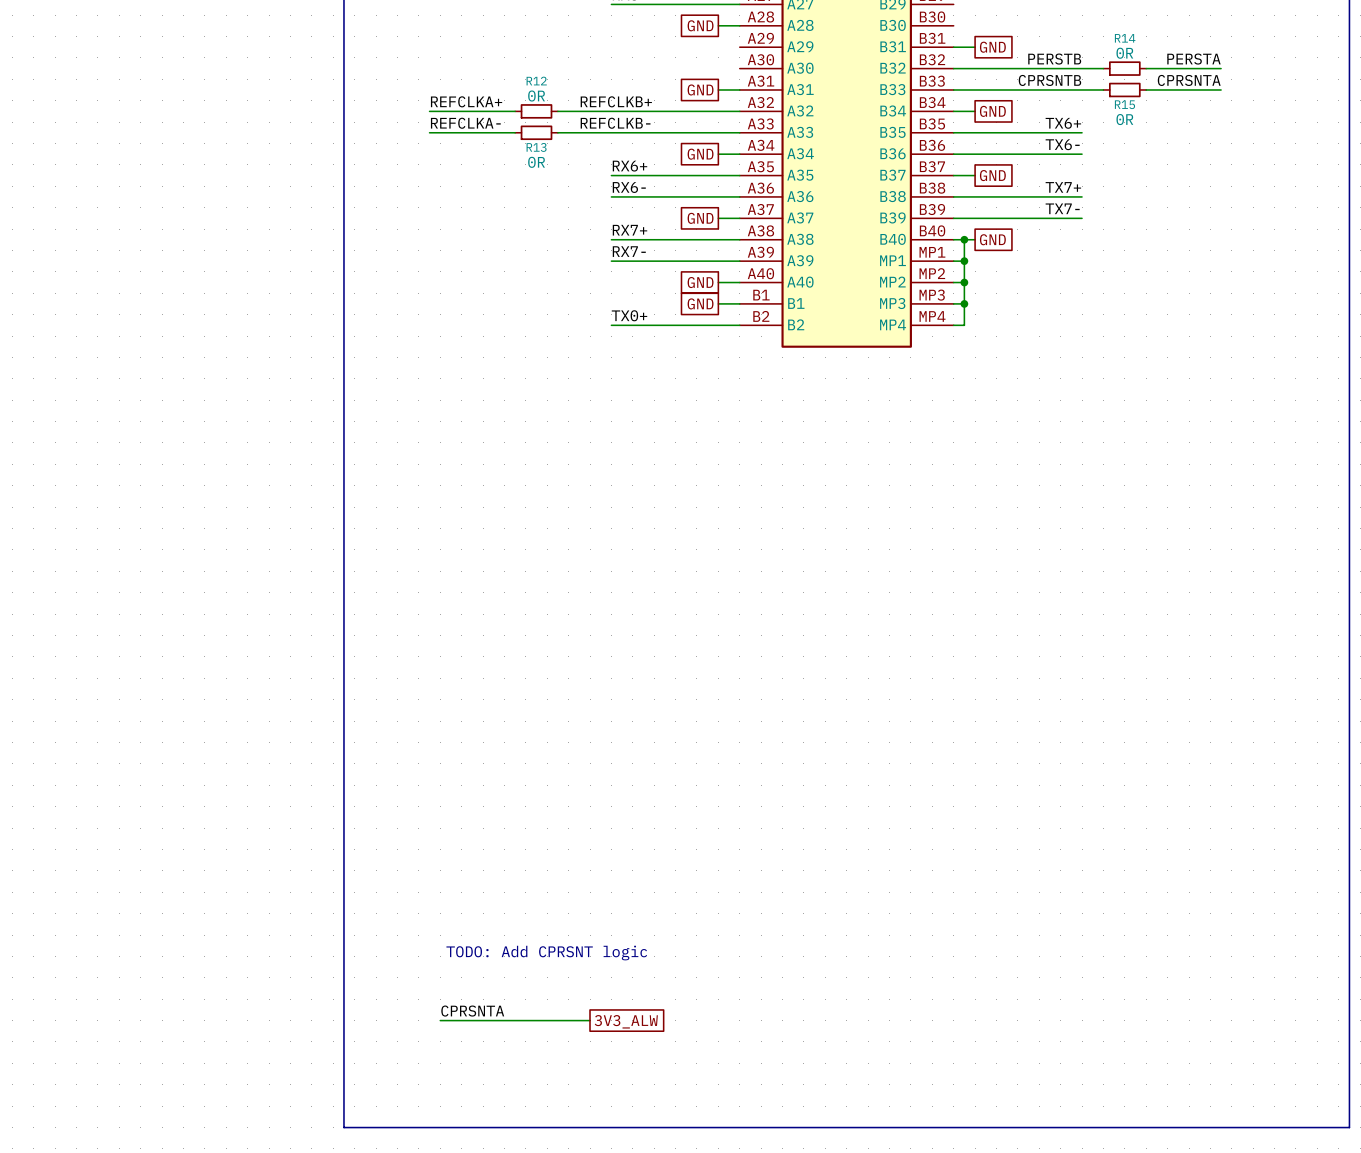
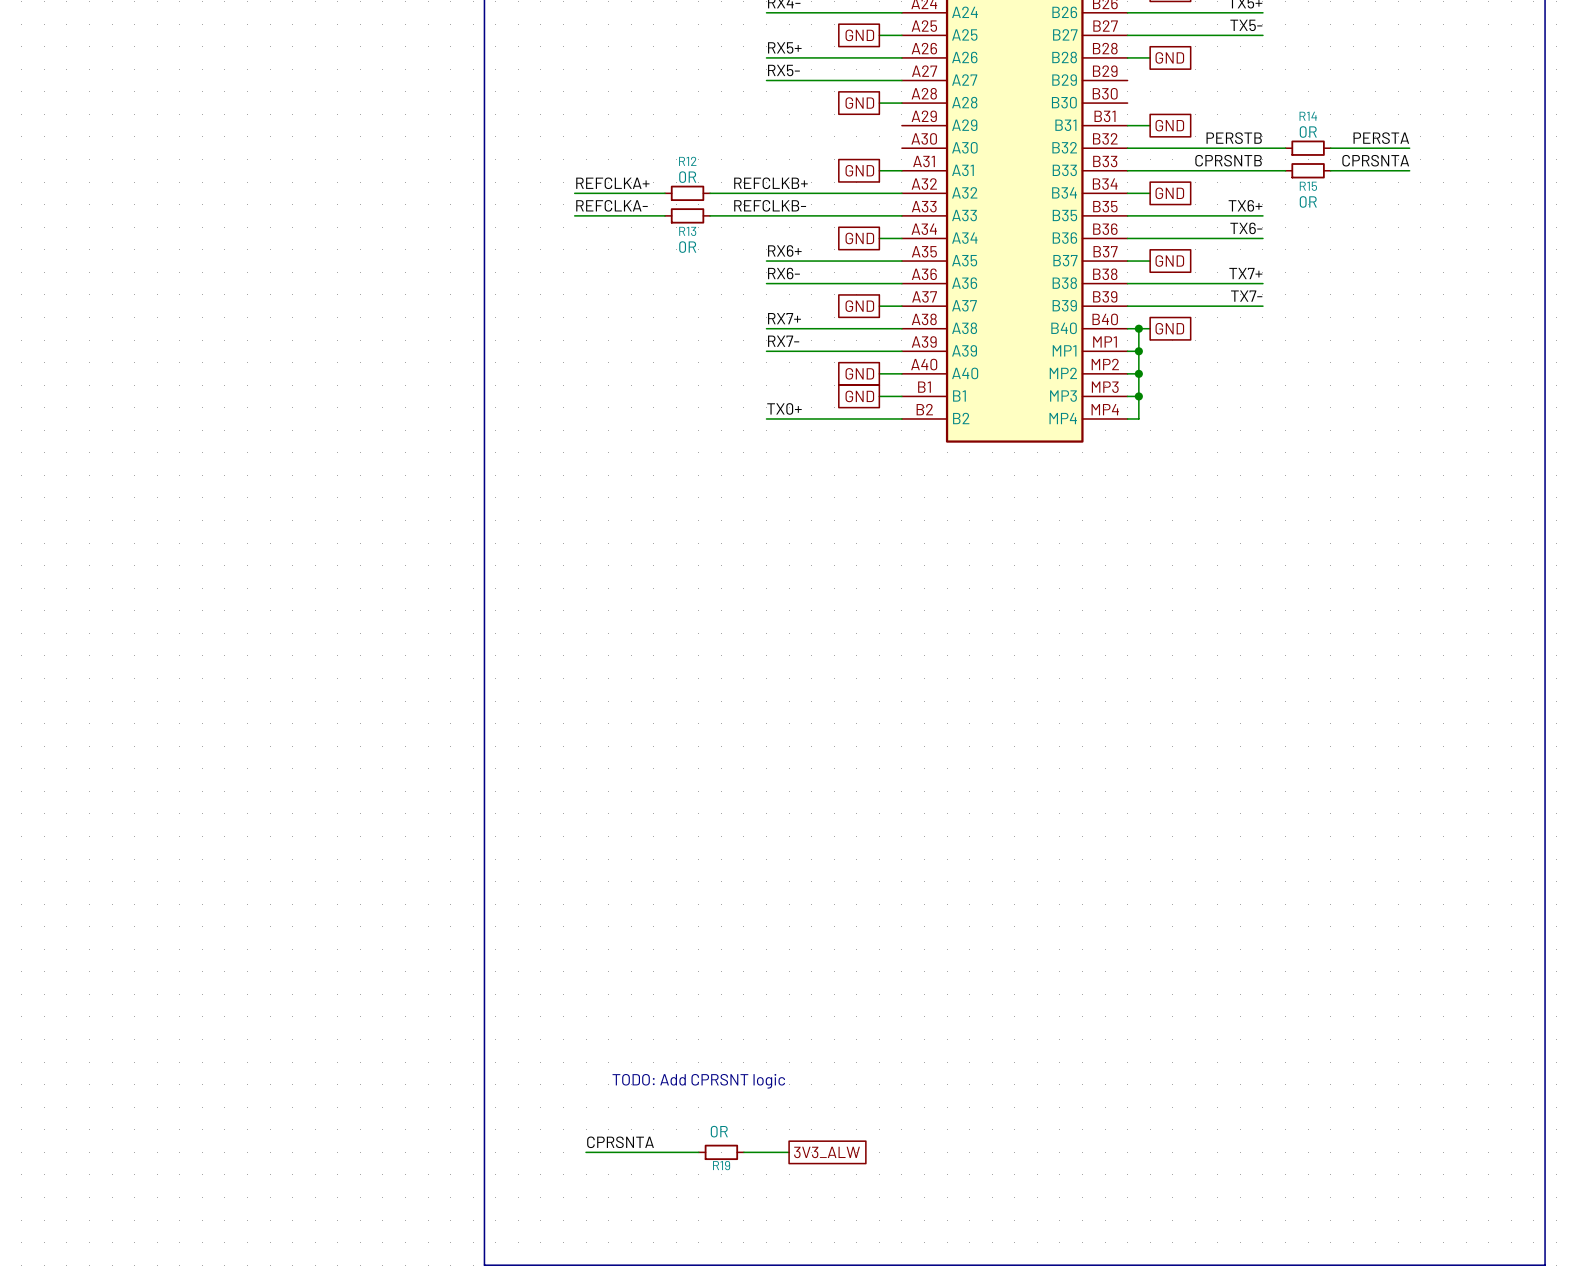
wire: (547, 1020) (590, 1020) -> (789, 1152) (743, 1152)
R19: none -> 0R (721, 1152)
global label position: 3V3_ALW (626, 1021) -> 3V3_ALW (827, 1152)

